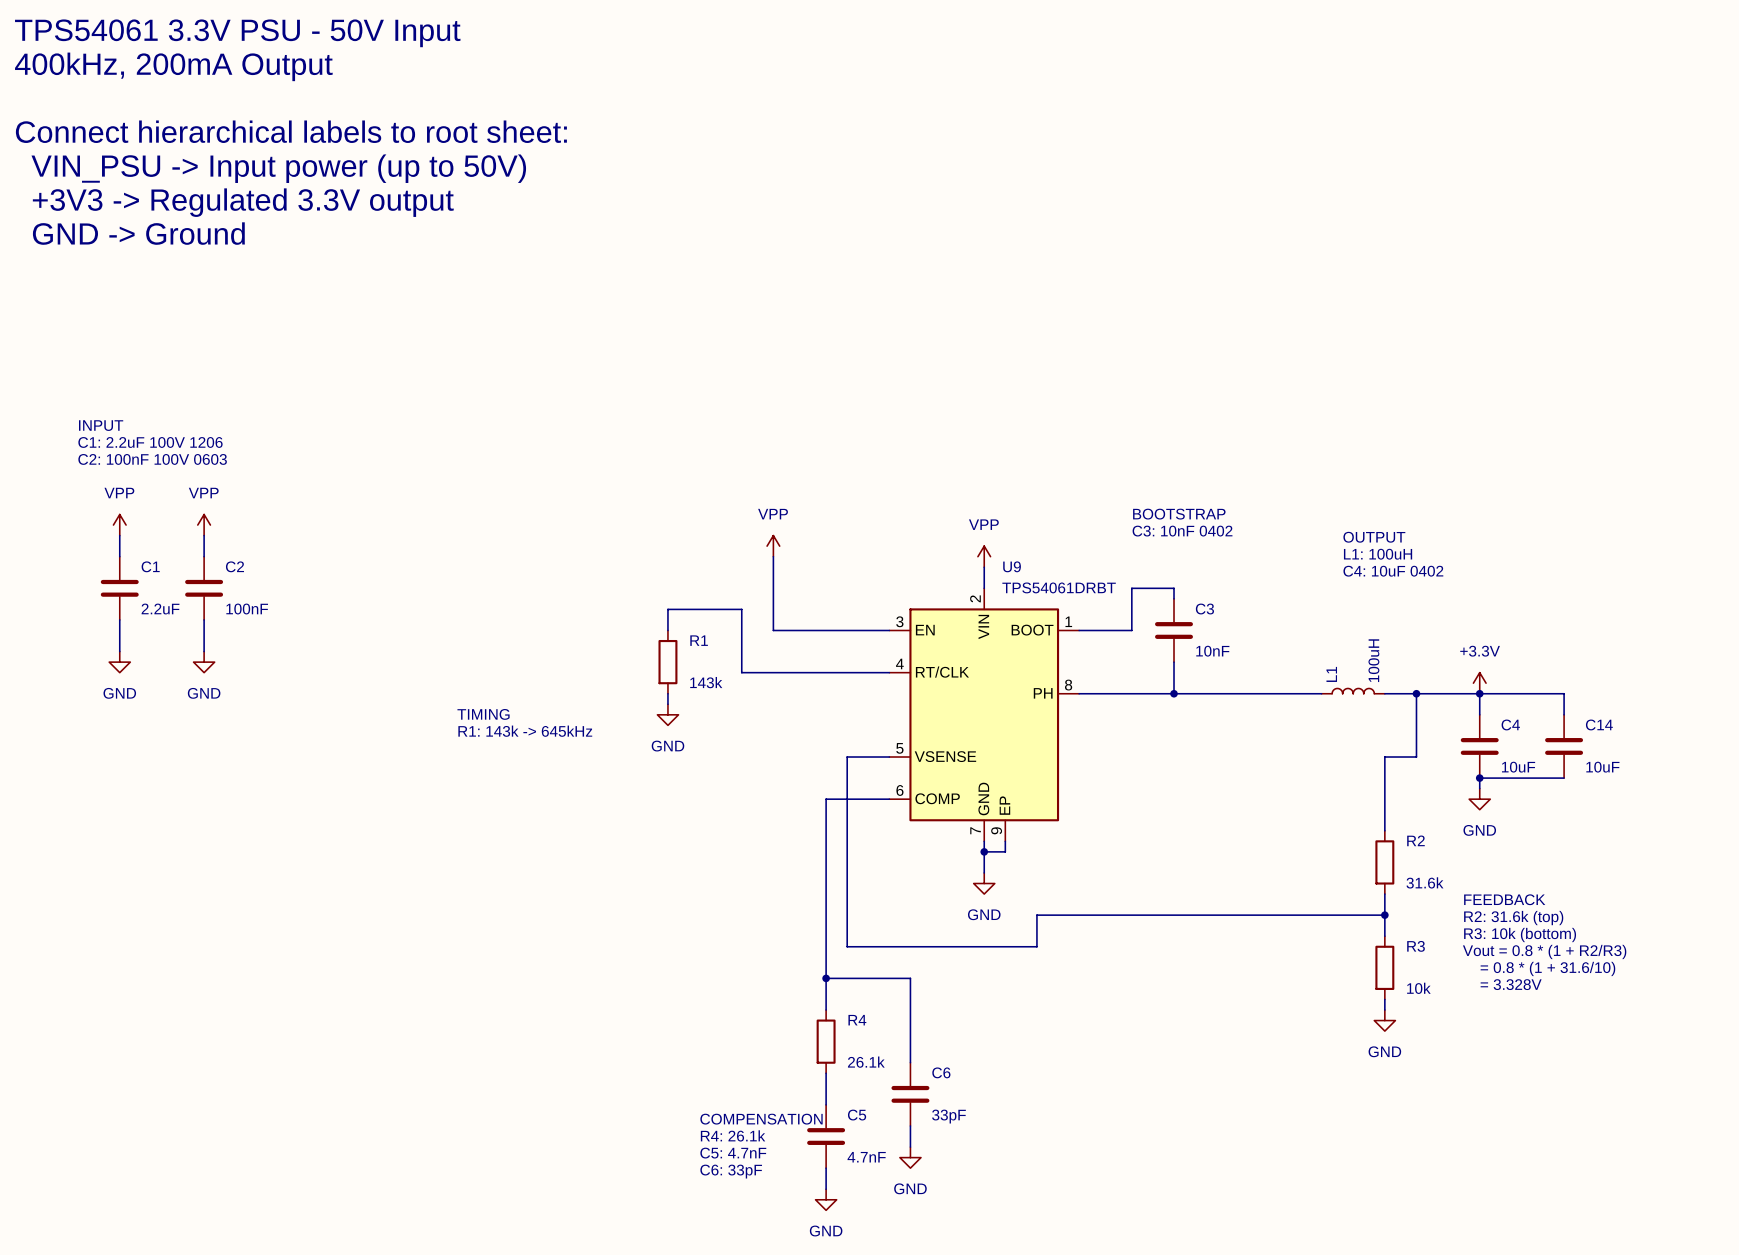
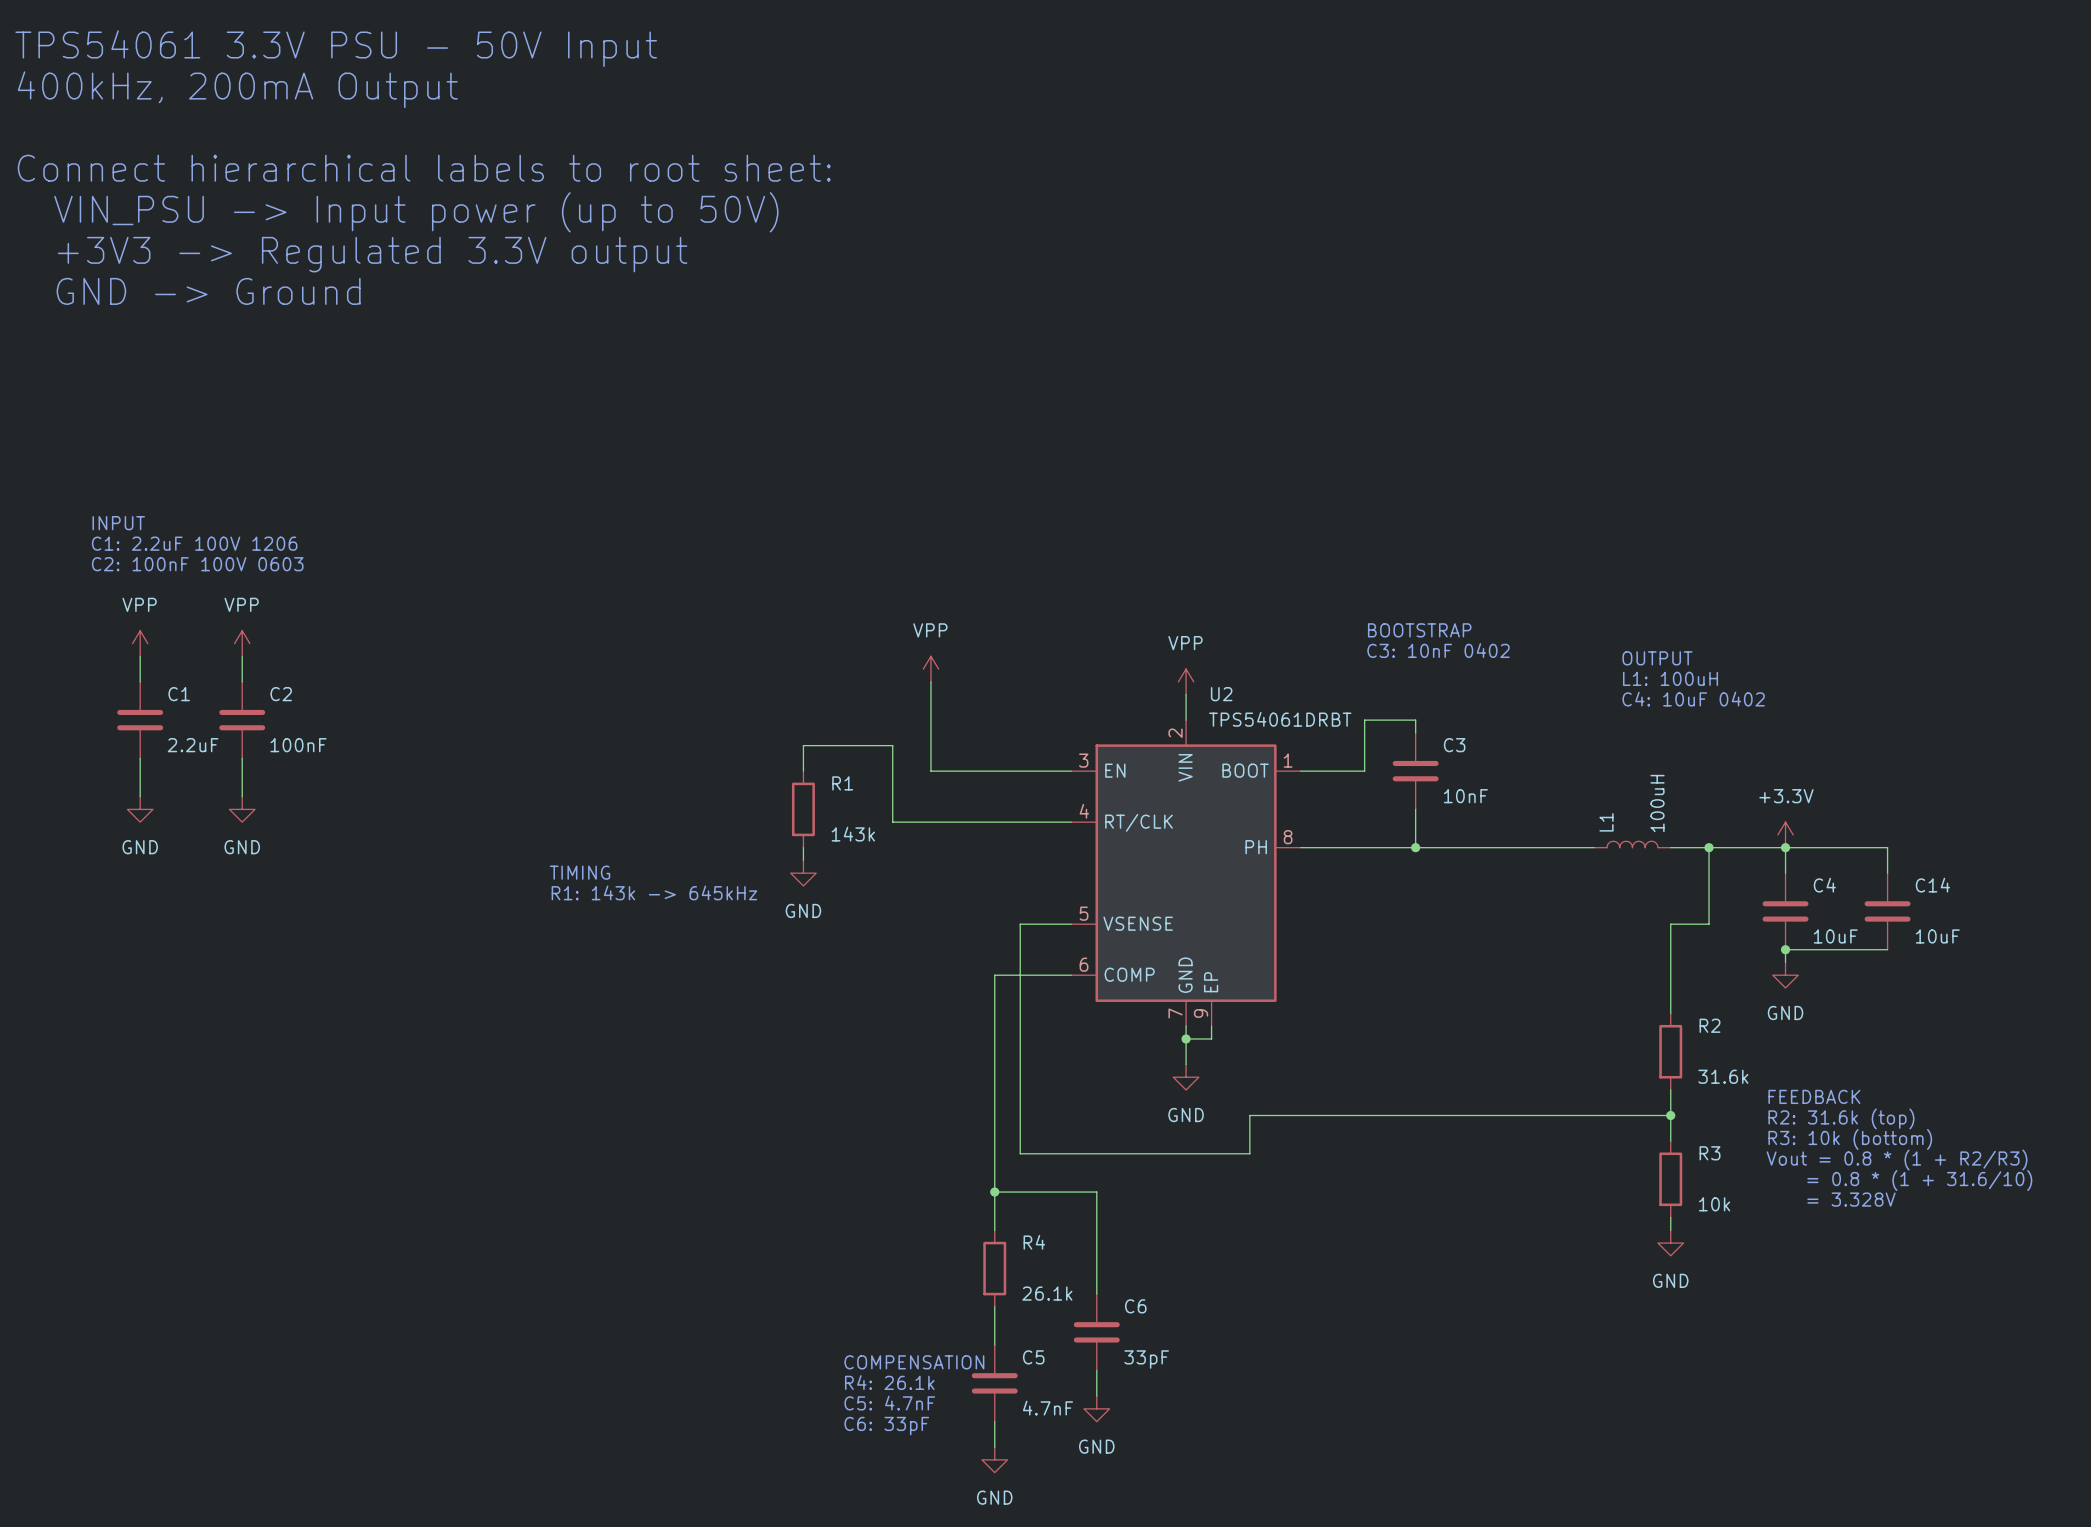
U9 name: U9 (1012, 566) -> U2 (1221, 694)

